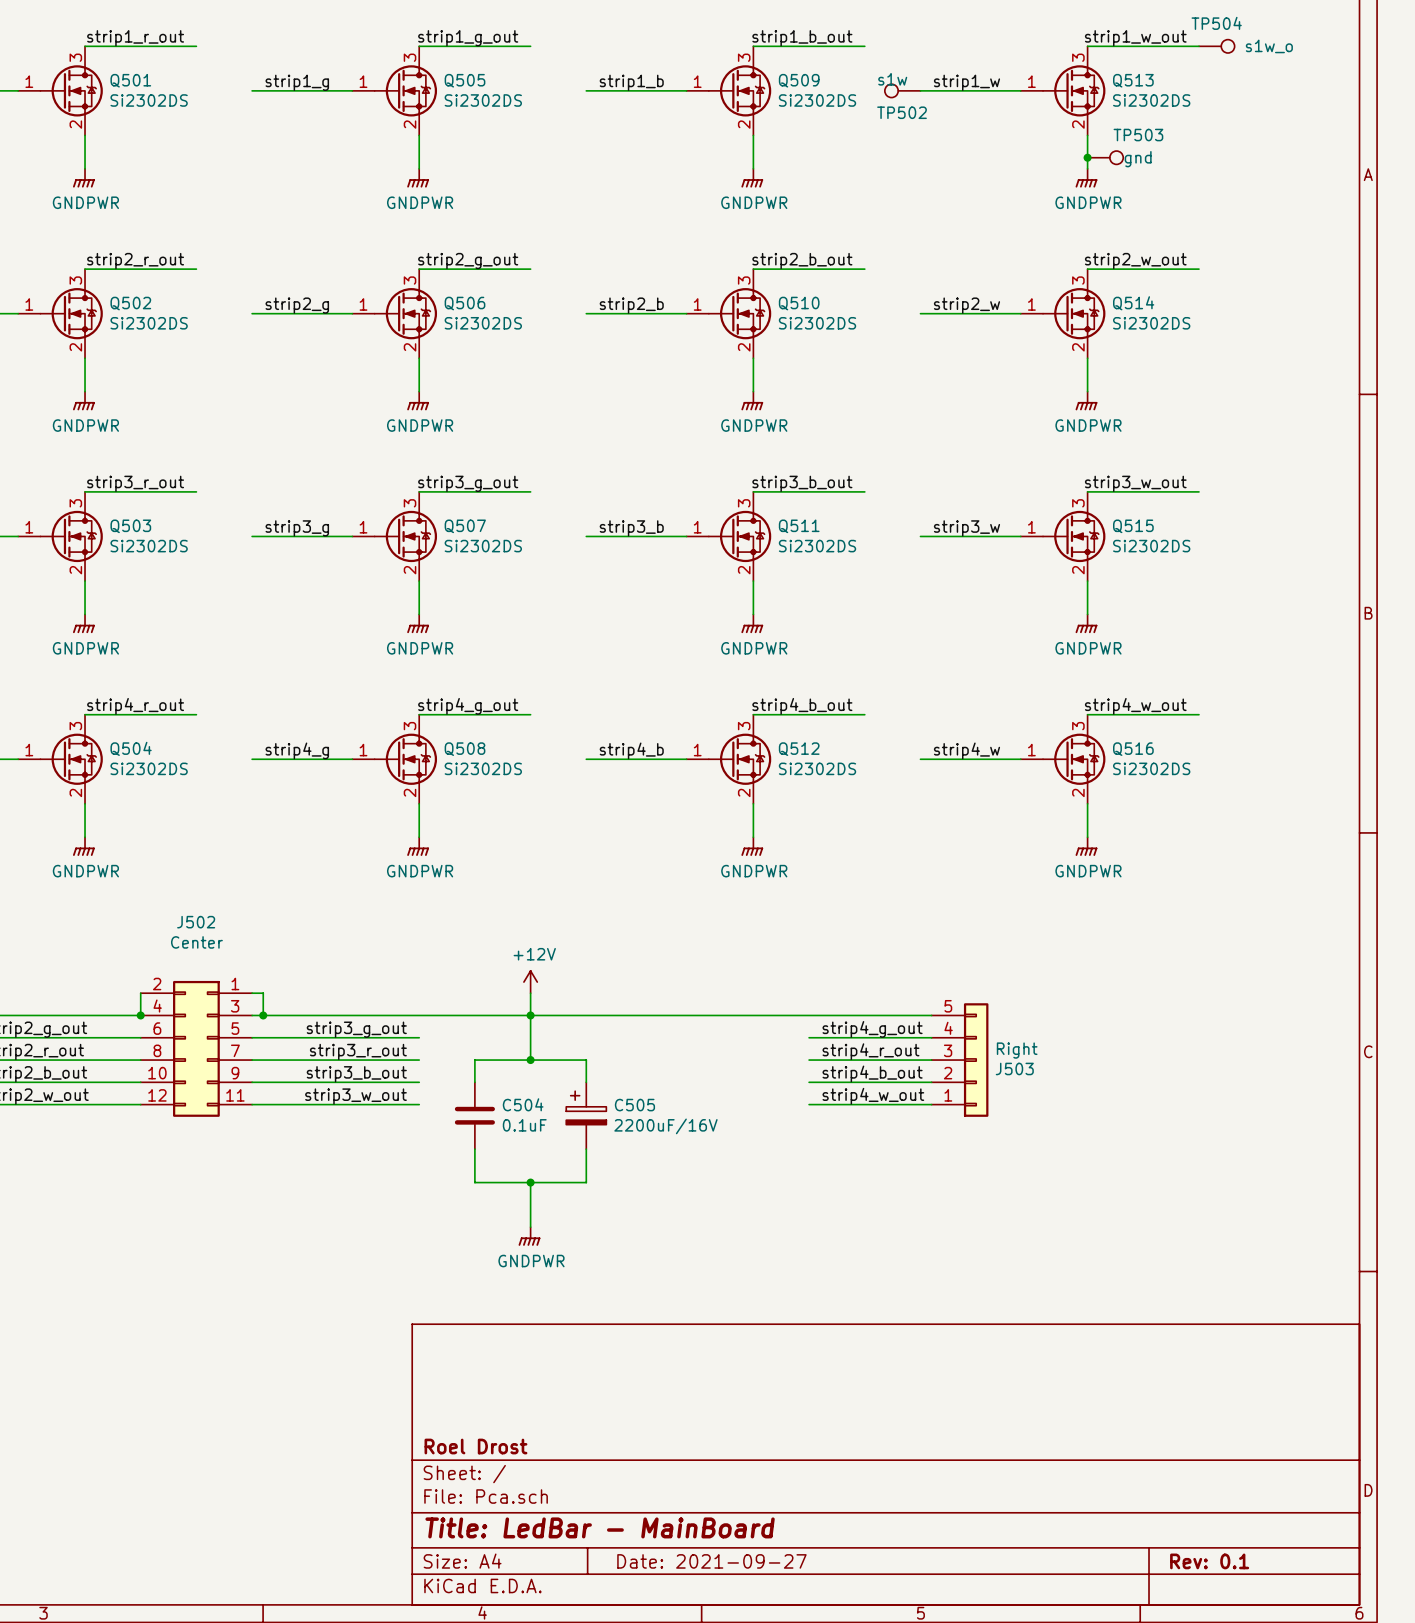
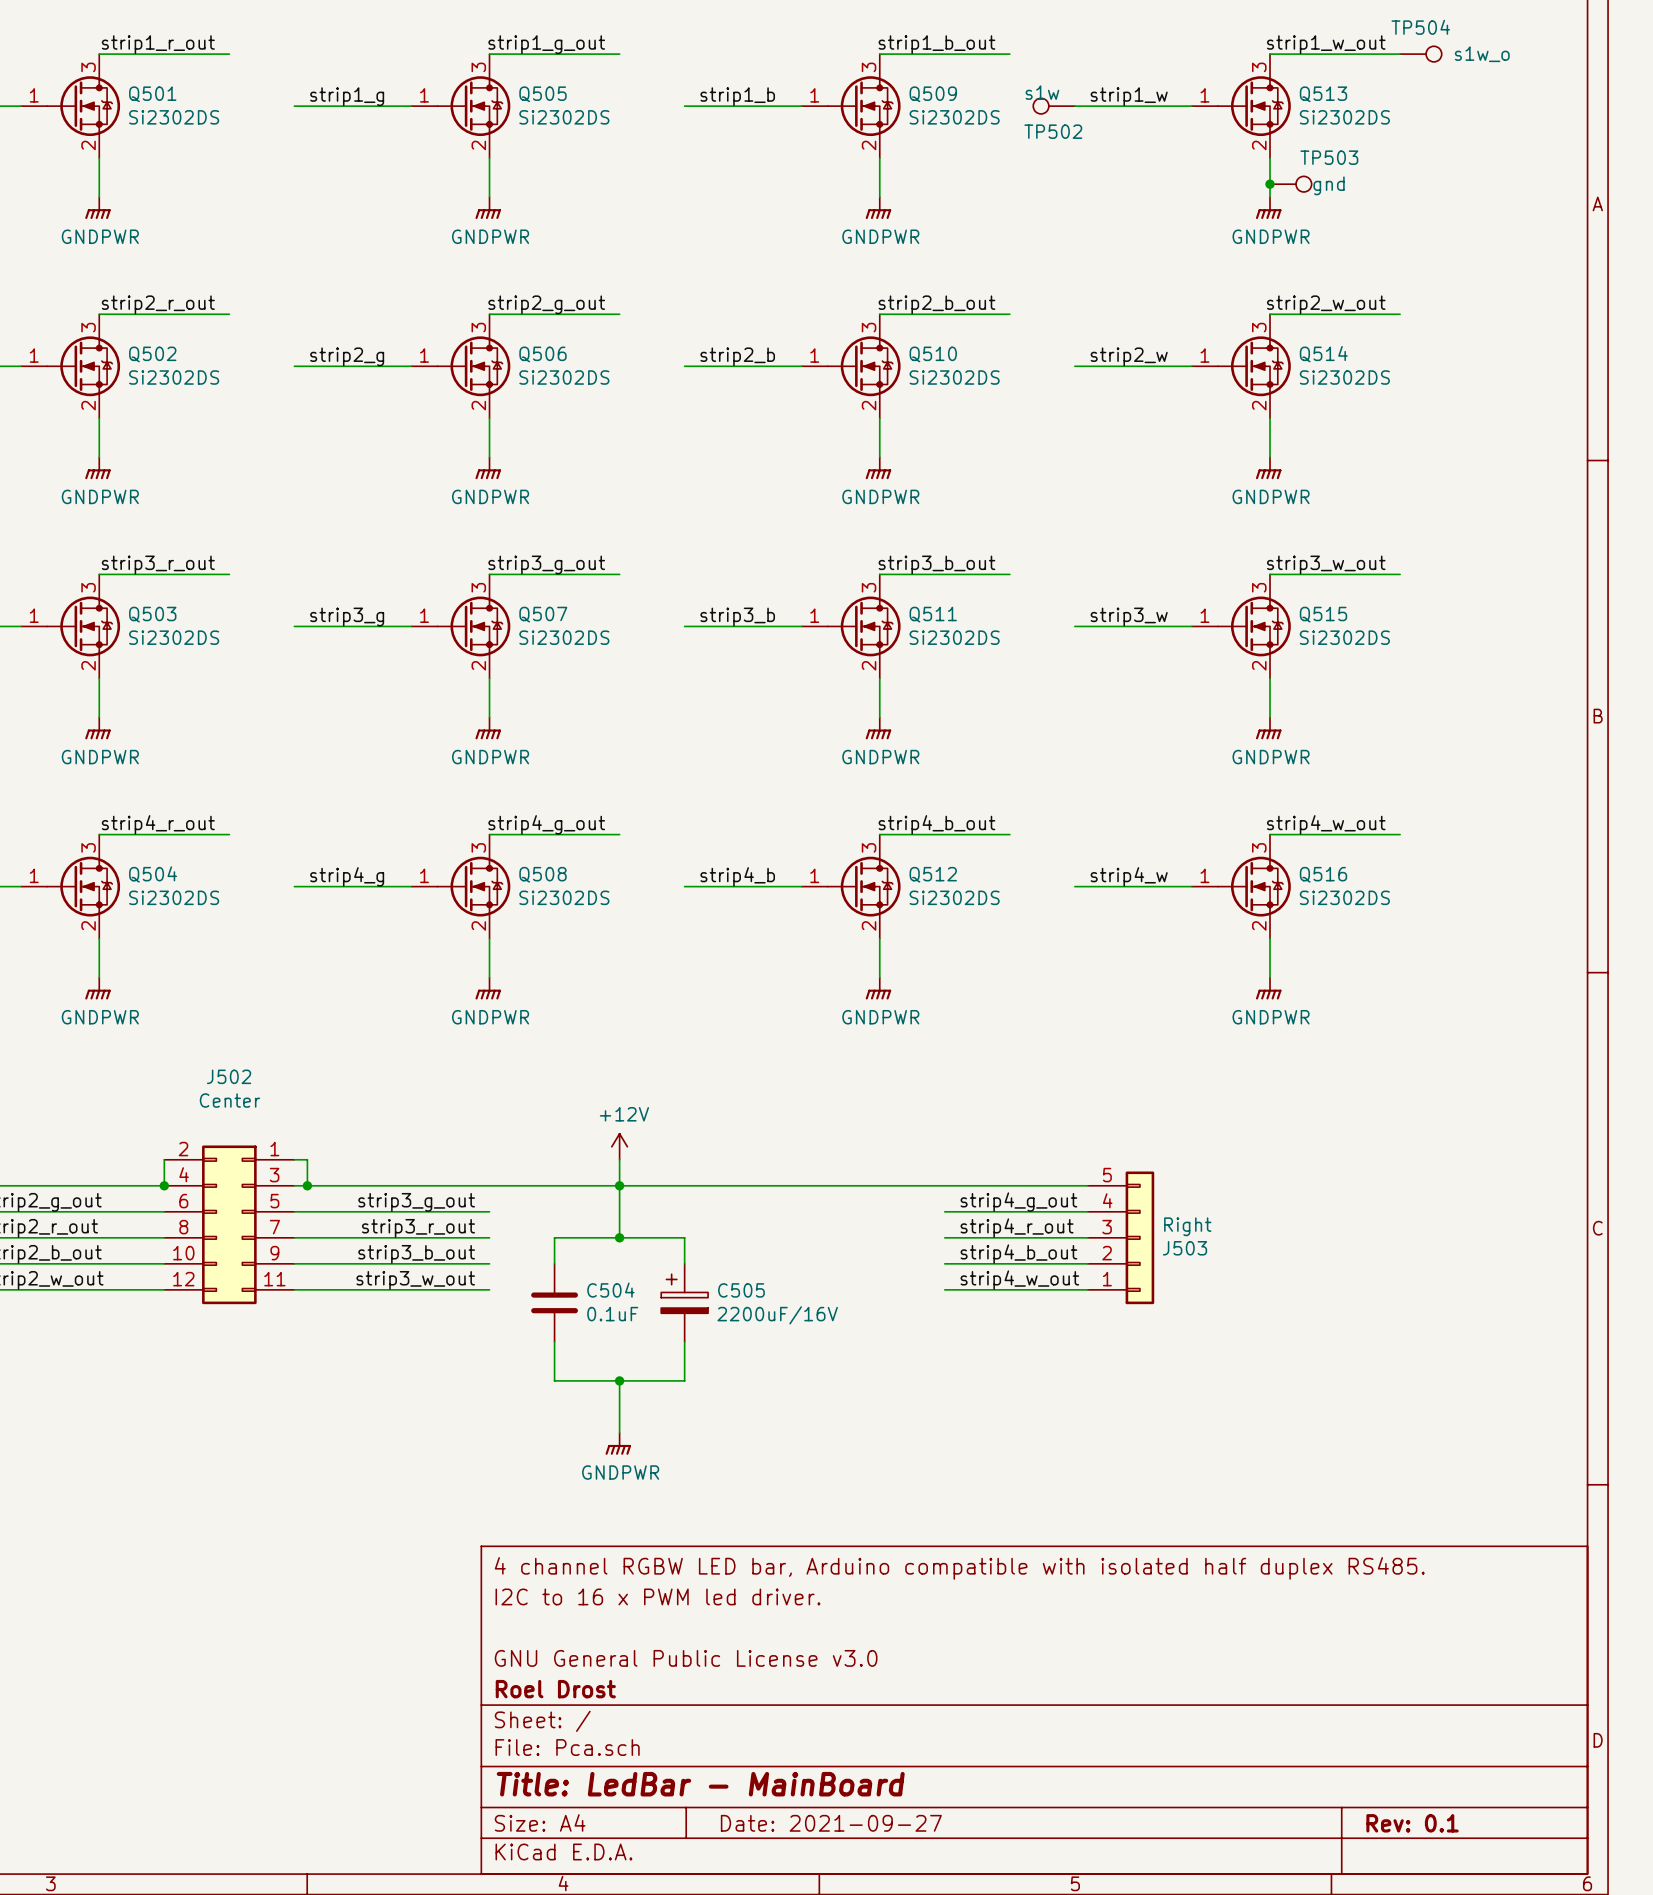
title block: none -> 4 channel RGBW LED bar, Arduino compatible with isolated half duplex RS485. (959, 1568)
title block: none -> I2C to 16 x PWM led driver. (657, 1596)
title block: none -> GNU General Public License v3.0 (686, 1658)

